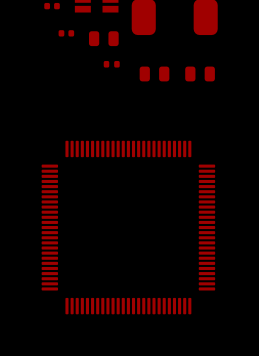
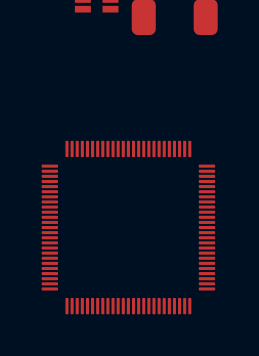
part: (52, 6) -> none
part: (66, 33) -> none
part: (103, 38) -> none
part: (111, 64) -> none
part: (154, 73) -> none
part: (200, 73) -> none

